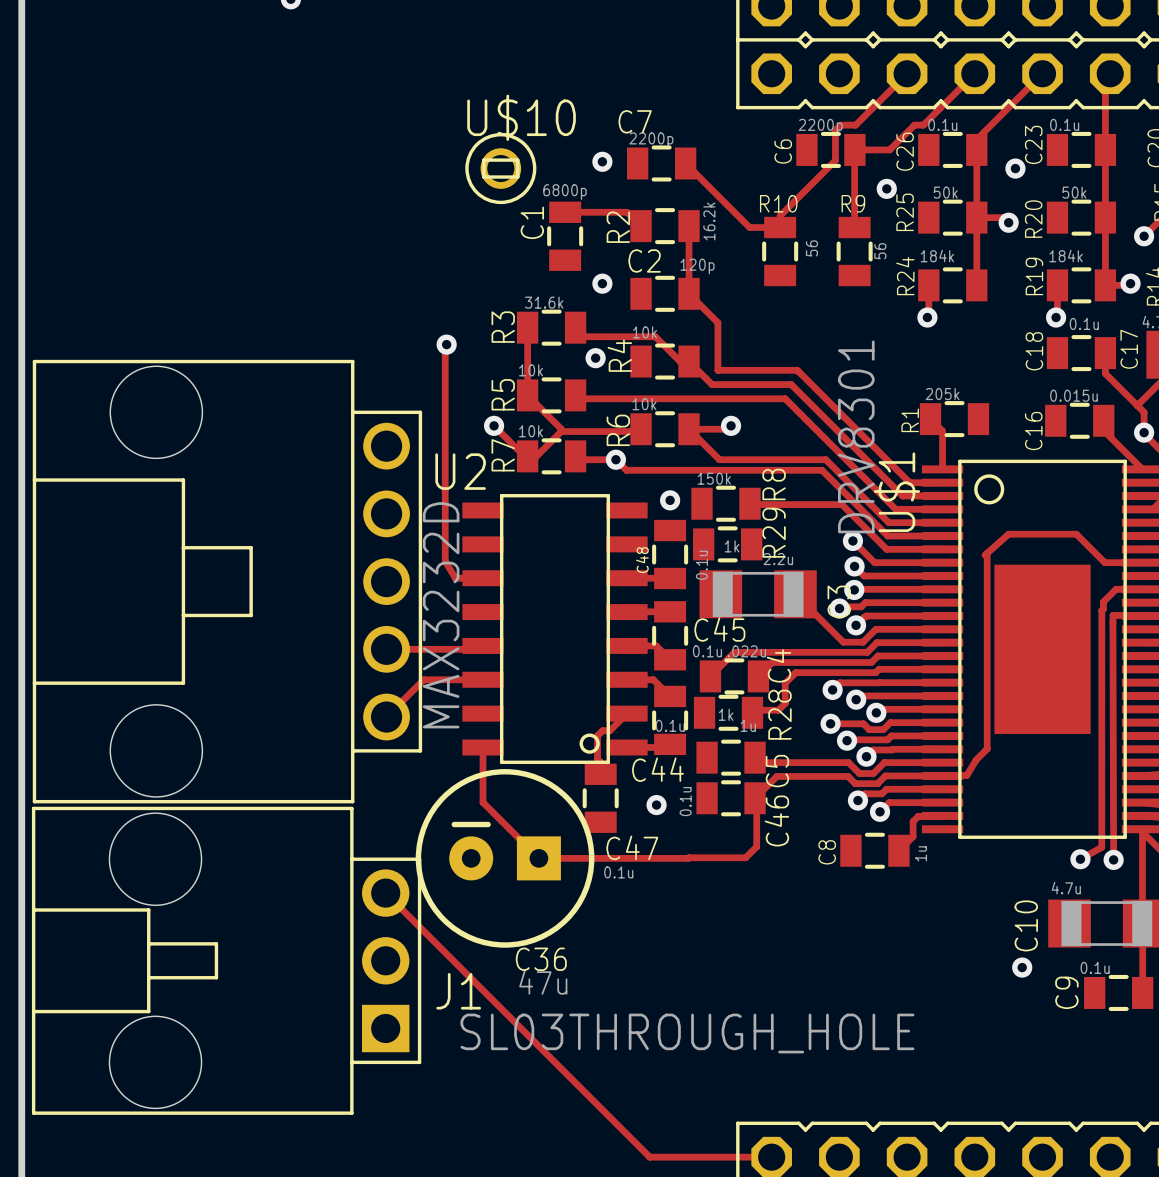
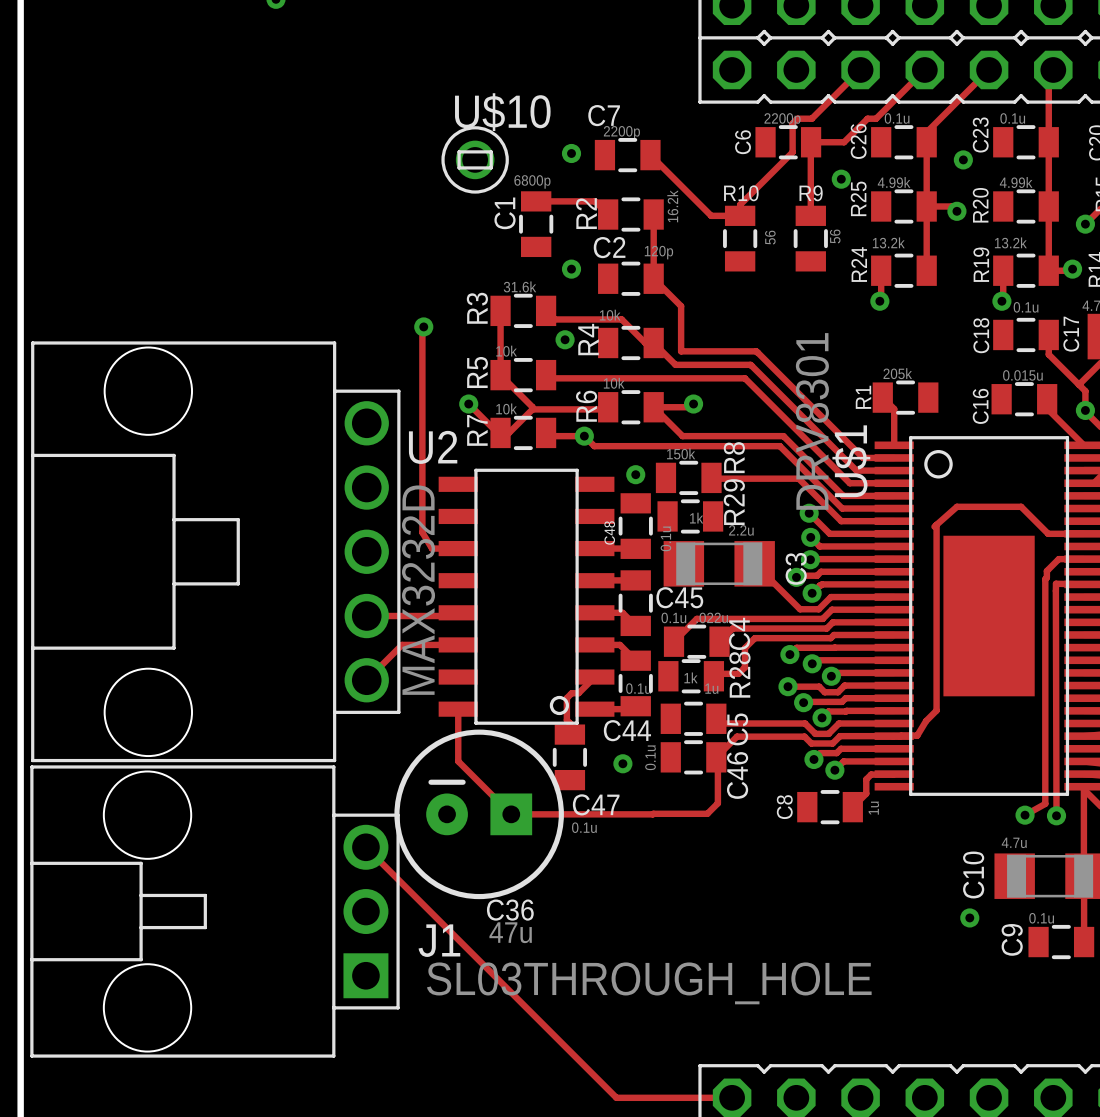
R25 value: 50k (945, 192) -> 4.99k (894, 182)
R20 value: 50k (1074, 192) -> 4.99k (1016, 182)
R24 value: 184k (937, 255) -> 13.2k (888, 242)
R19 value: 184k (1066, 255) -> 13.2k (1010, 242)

